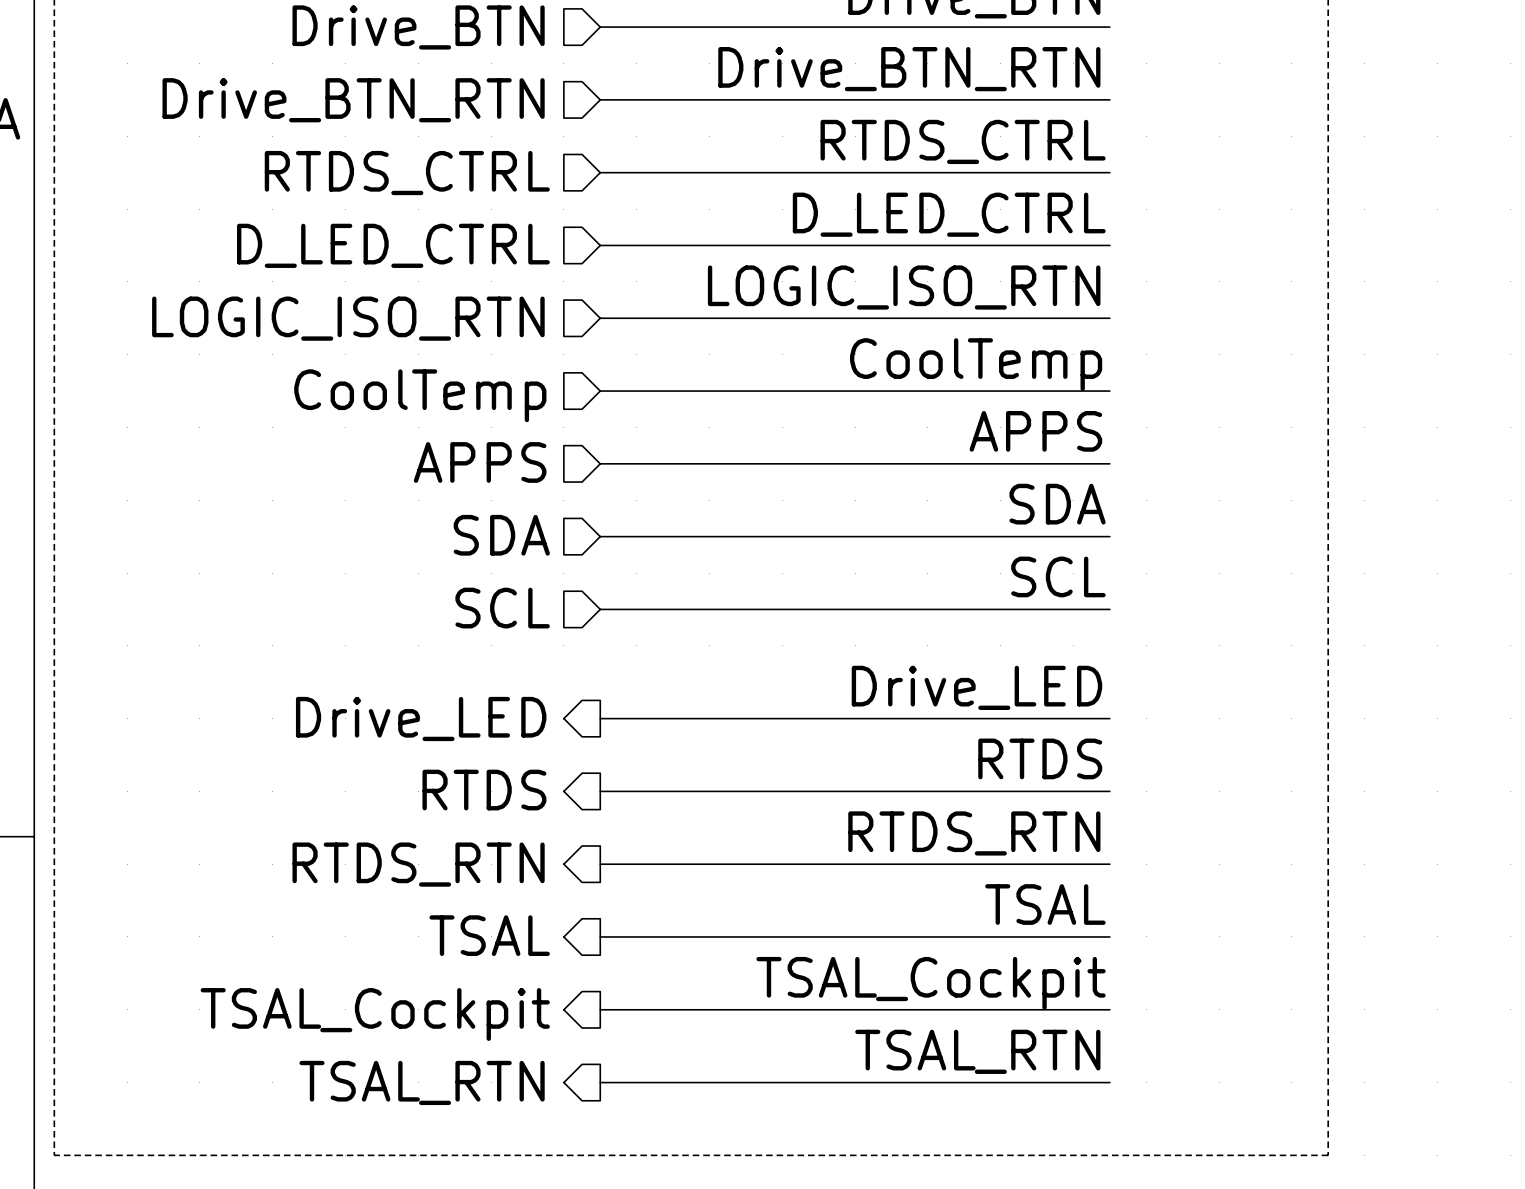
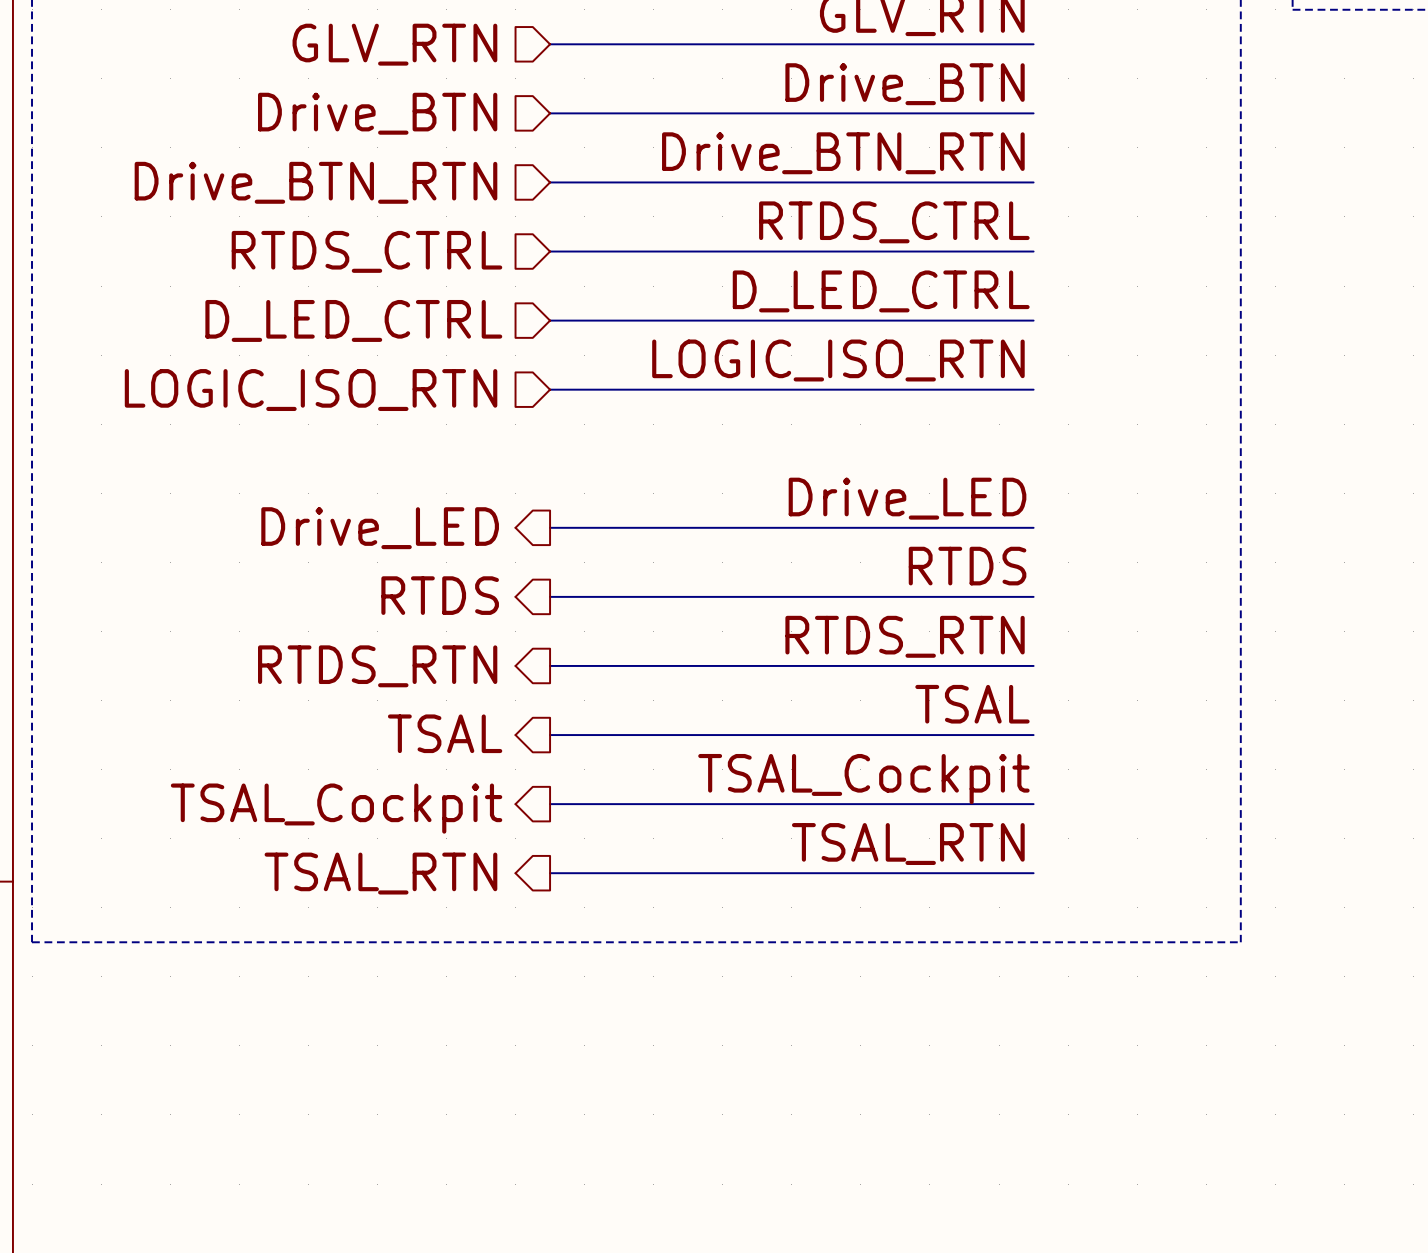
label: CoolTemp (976, 364) -> none
wire: (600, 391) (1109, 391) -> none
hierarchical label: CoolTemp (420, 395) -> none
label: APPS (1035, 431) -> Drive_LED (907, 498)
hierarchical label shape: input (480, 462) -> output (380, 528)
hierarchical label: APPS (480, 462) -> Drive_LED (380, 528)
label: SDA (1057, 504) -> RTDS (967, 566)
hierarchical label shape: input (501, 535) -> output (440, 595)
hierarchical label: SDA (501, 535) -> RTDS (440, 595)
label: SCL (1058, 576) -> RTDS_RTN (905, 636)
hierarchical label shape: input (502, 608) -> output (377, 666)
hierarchical label: SCL (502, 608) -> RTDS_RTN (377, 666)
label: Drive_LED (976, 687) -> none
hierarchical label: Drive_LED (421, 718) -> none
wire: (600, 718) (1109, 718) -> (550, 735) (1033, 735)
label: RTDS (1040, 758) -> none
hierarchical label: RTDS (484, 790) -> none
wire: (600, 791) (1109, 791) -> (550, 804) (1033, 804)
label: RTDS_RTN (974, 833) -> none
hierarchical label: RTDS_RTN (418, 864) -> none
wire: (600, 864) (1109, 864) -> (550, 873) (1033, 873)
line: (54, 900) (54, 1155) (1328, 1155) (1328, 900) -> (32, 942) (1240, 942)
label position: TSAL (1045, 904) -> TSAL (972, 704)
hierarchical label position: TSAL (489, 935) -> TSAL (445, 733)
wire: (600, 936) (1109, 936) -> none
label position: TSAL_Cockpit (931, 983) -> TSAL_Cockpit (863, 779)
wire: (600, 1009) (1109, 1009) -> none
hierarchical label position: TSAL_Cockpit (375, 1014) -> TSAL_Cockpit (336, 808)
label position: TSAL_RTN (977, 1051) -> TSAL_RTN (908, 844)
hierarchical label position: TSAL_RTN (422, 1082) -> TSAL_RTN (380, 873)
wire: (600, 1082) (1109, 1082) -> none

